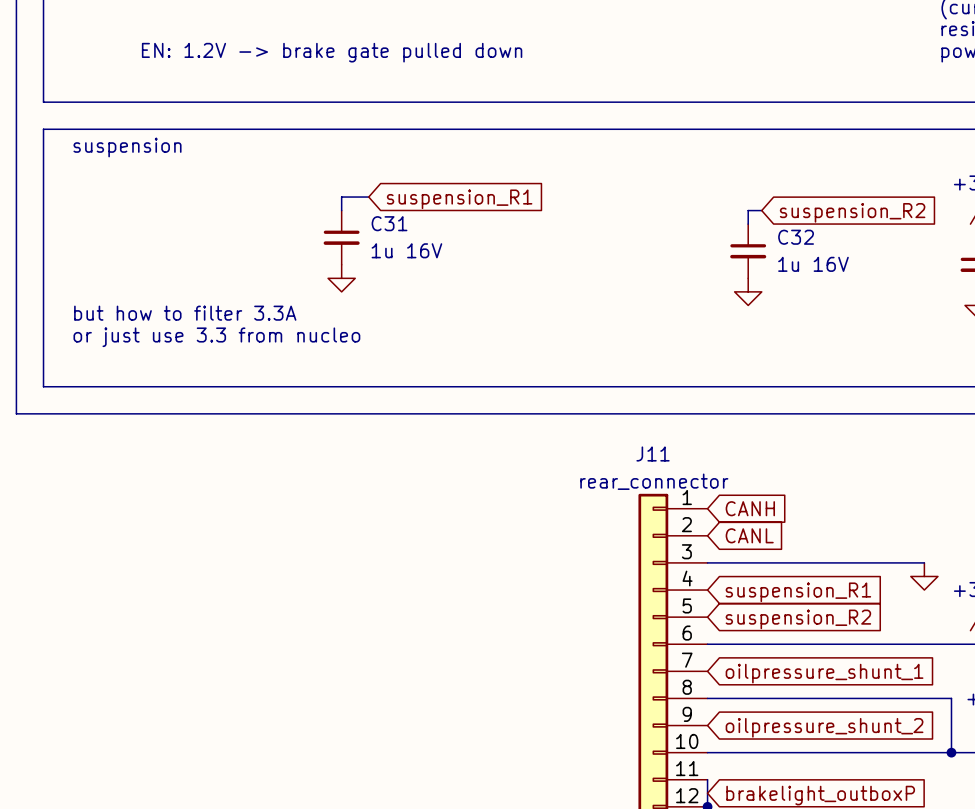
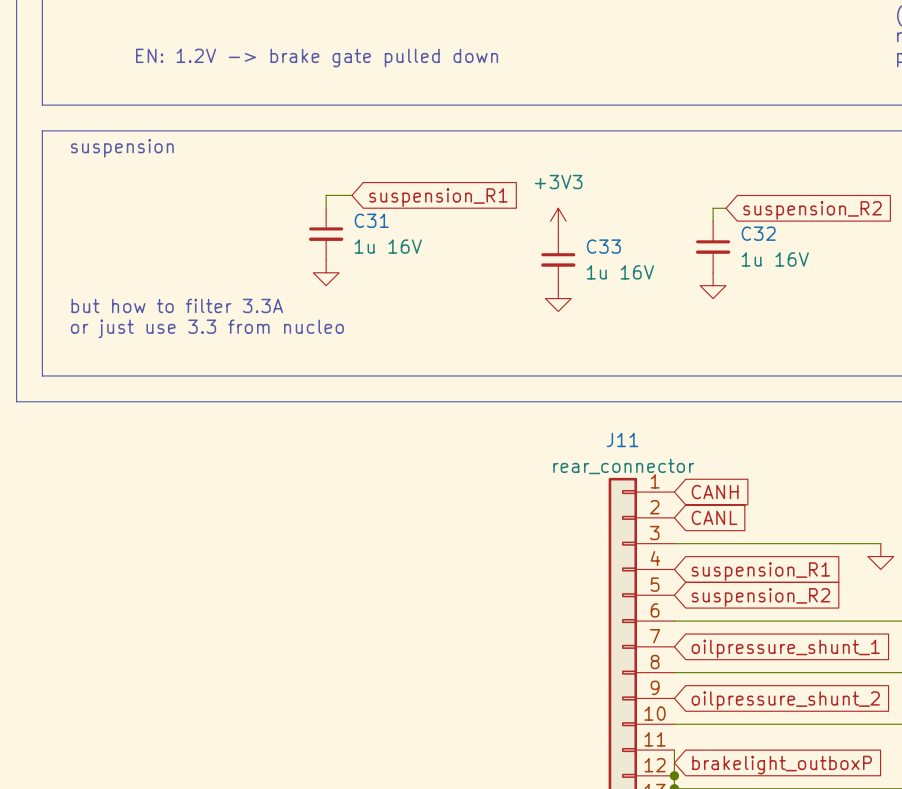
power symbol: none -> +3V3 (558, 221)
C33: none -> 1u 16V (558, 259)
power symbol: none -> (558, 298)

